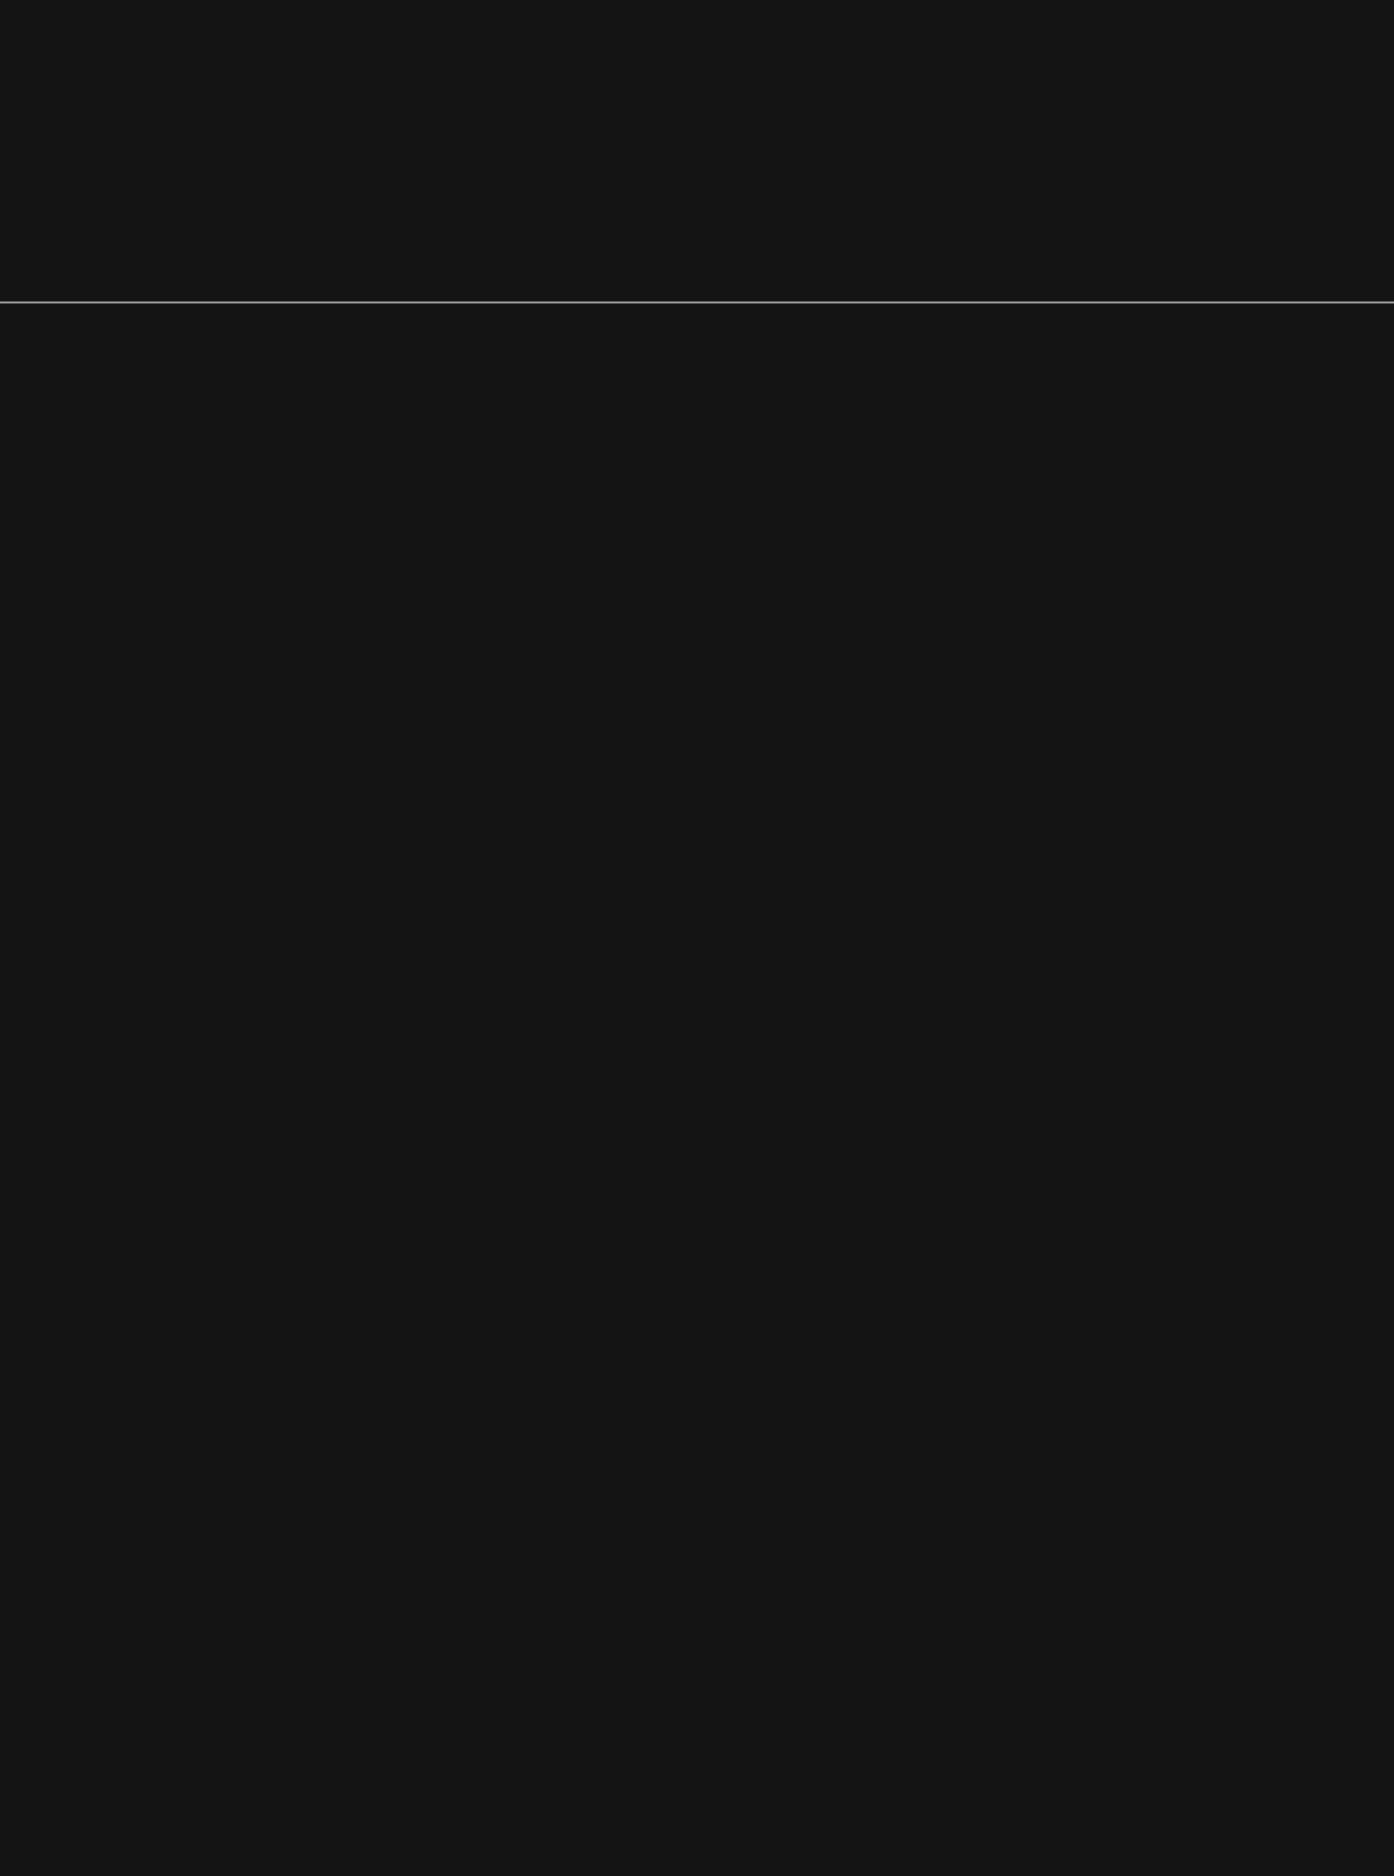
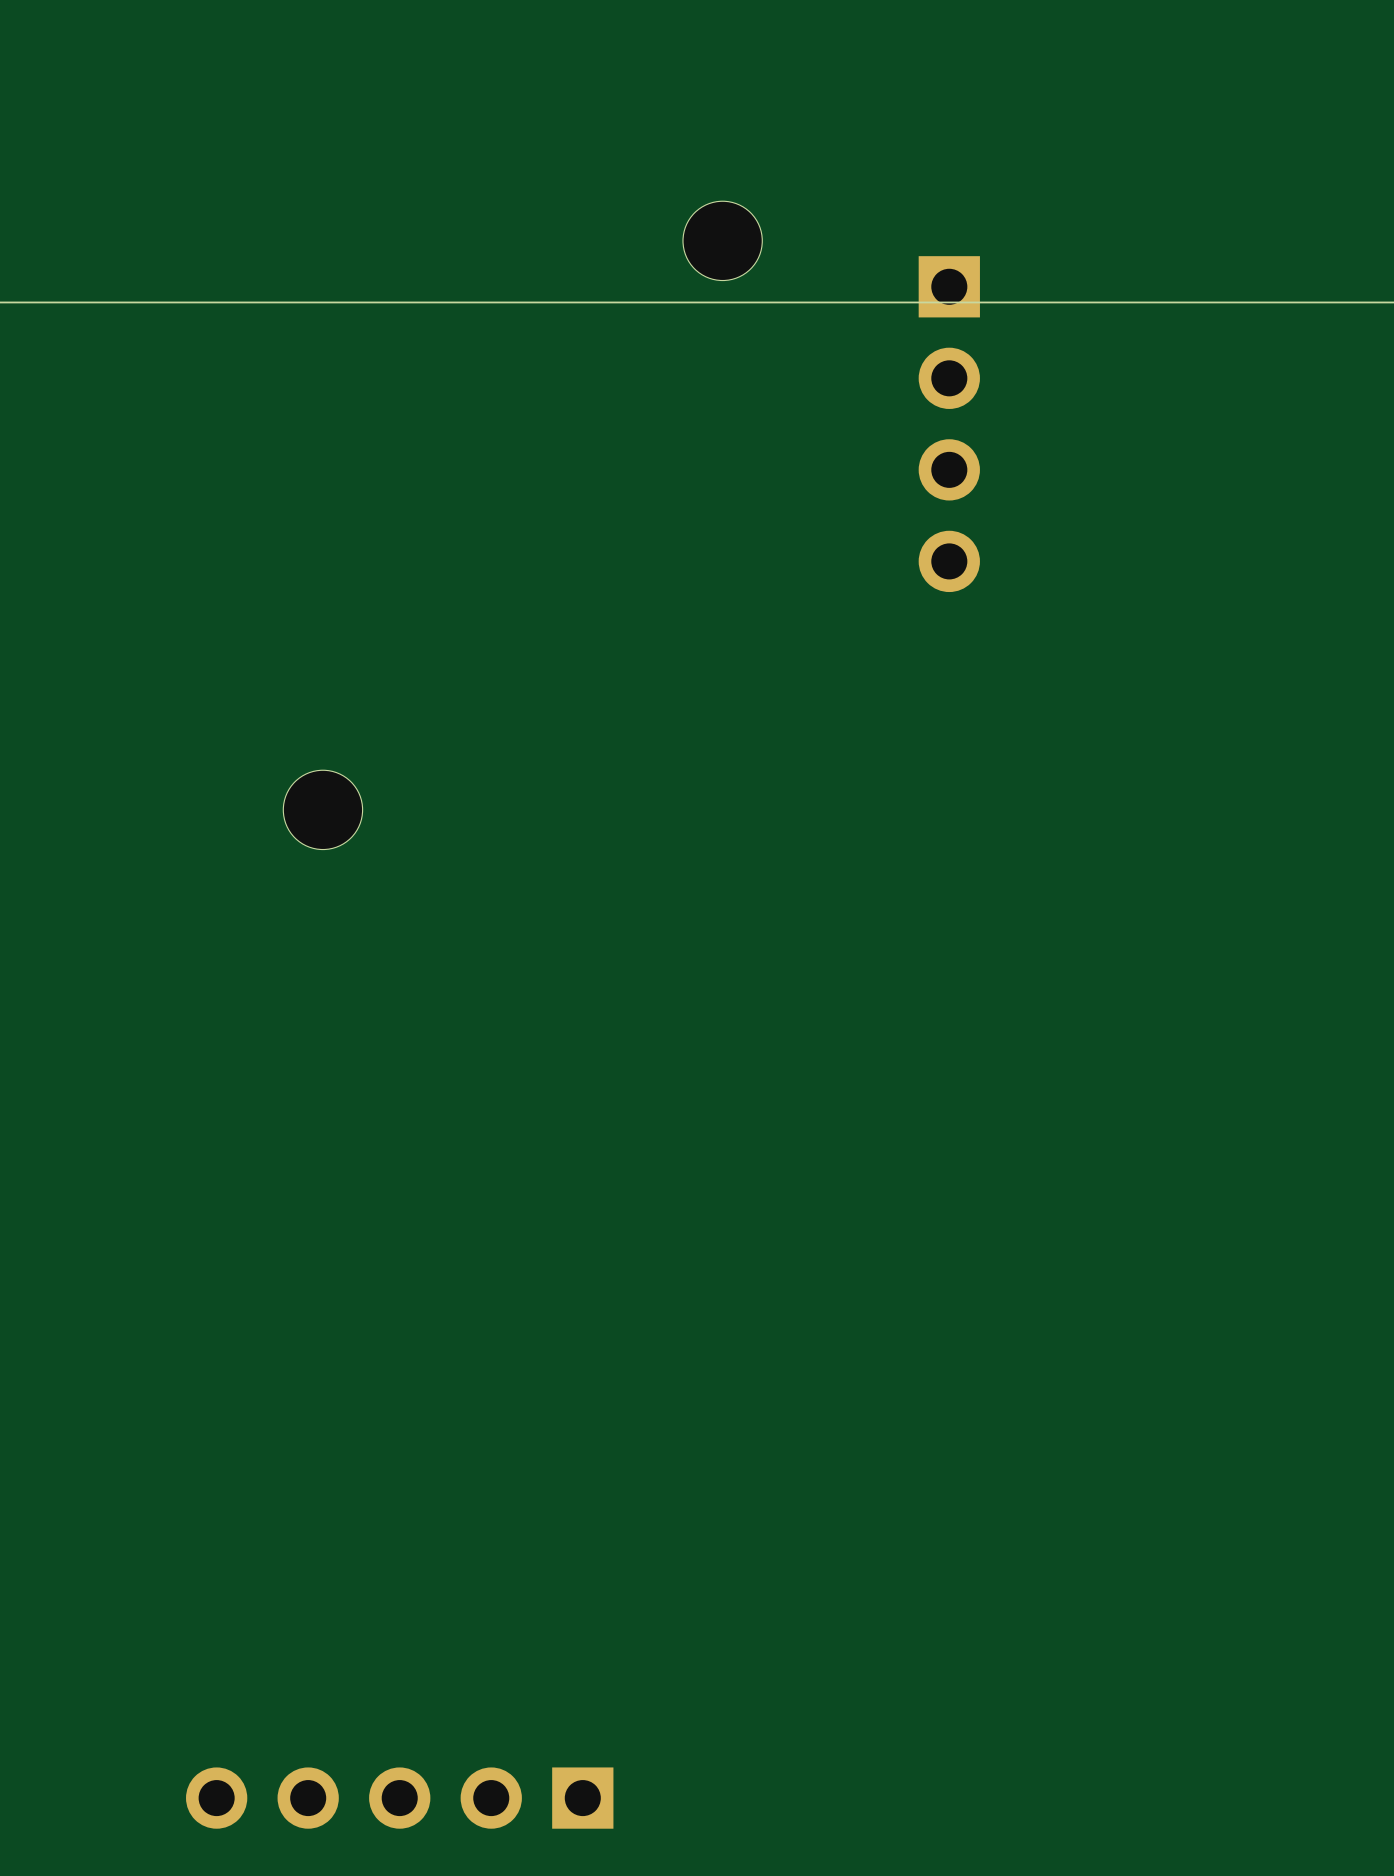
part: none -> (722, 240)
part: none -> (949, 424)
part: none -> (322, 809)
part: none -> (399, 1798)

